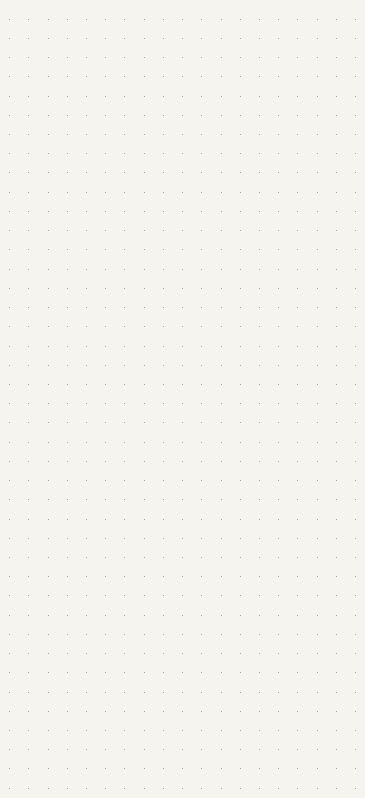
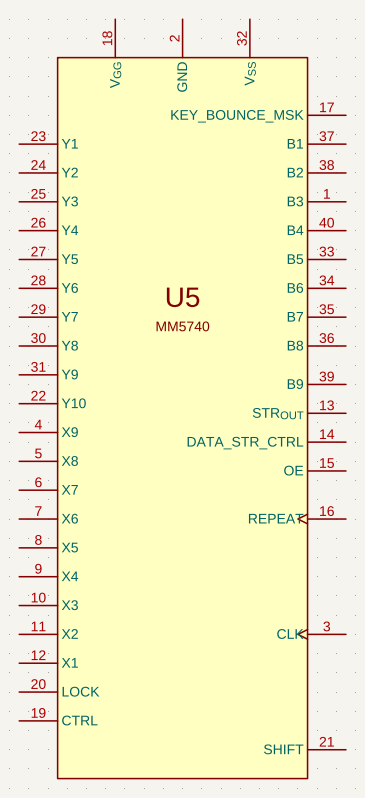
part: none -> (182, 398)

